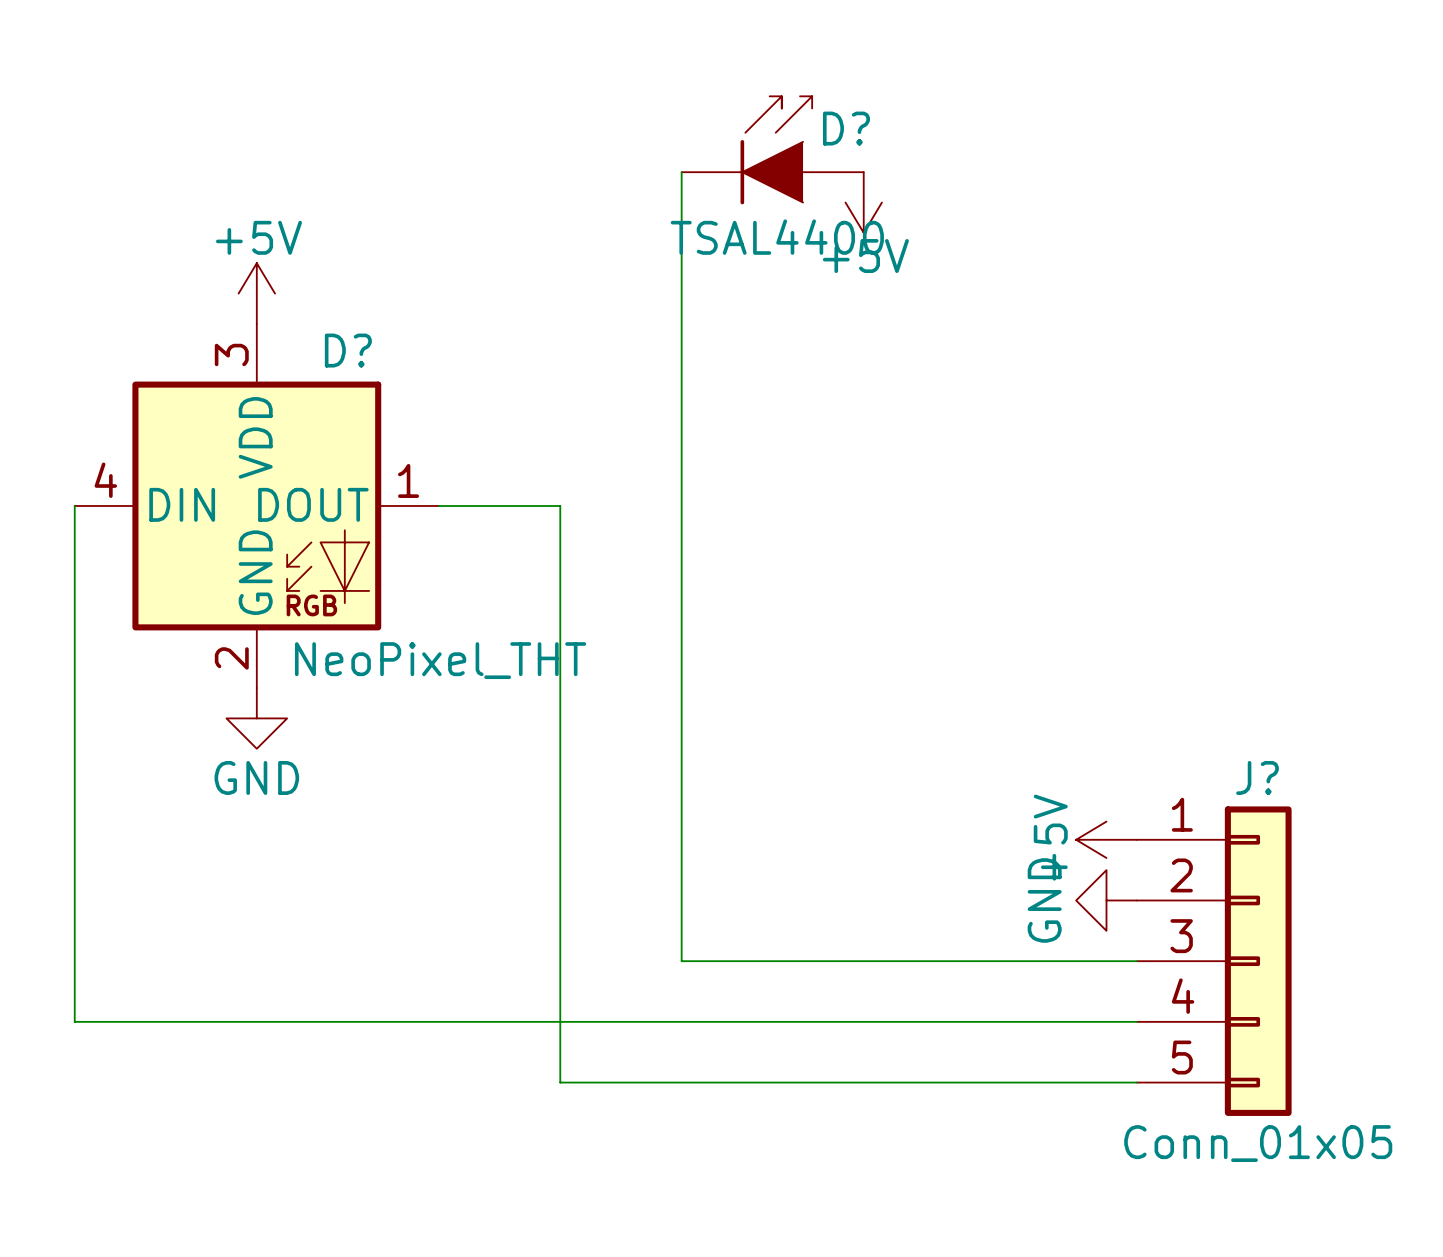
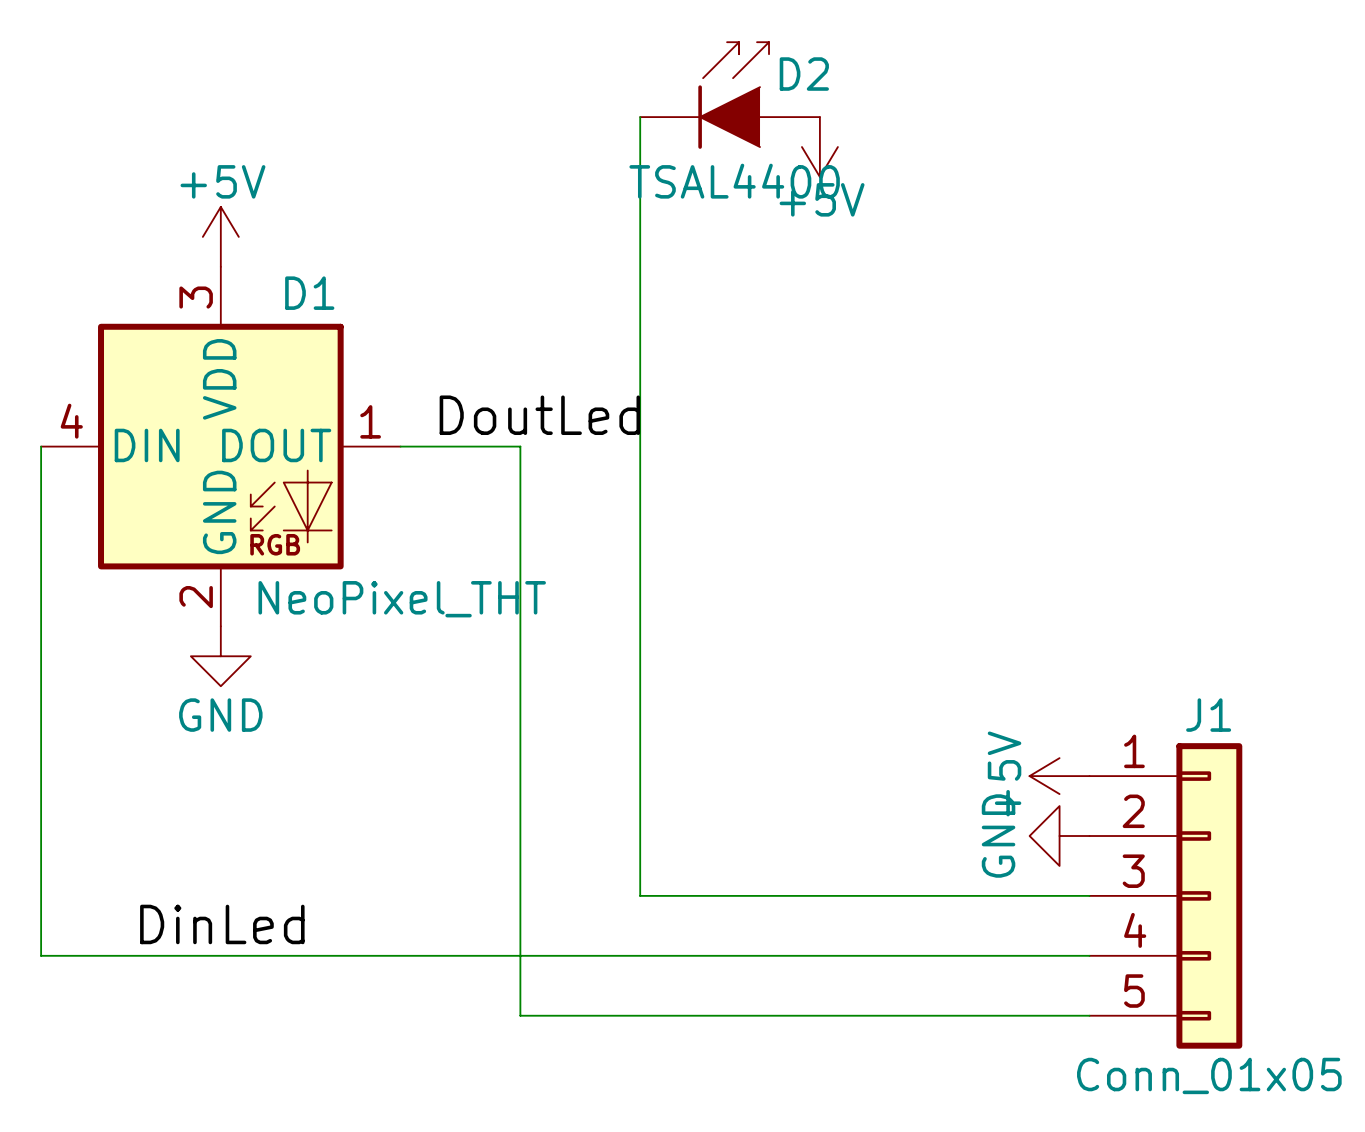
D? name: D? (846, 128) -> D2 (804, 74)
D? name: D? (348, 350) -> D1 (309, 293)
label: none -> DoutLed (539, 415)
J? name: J? (1257, 777) -> J1 (1208, 715)
label: none -> DinLed (222, 924)

